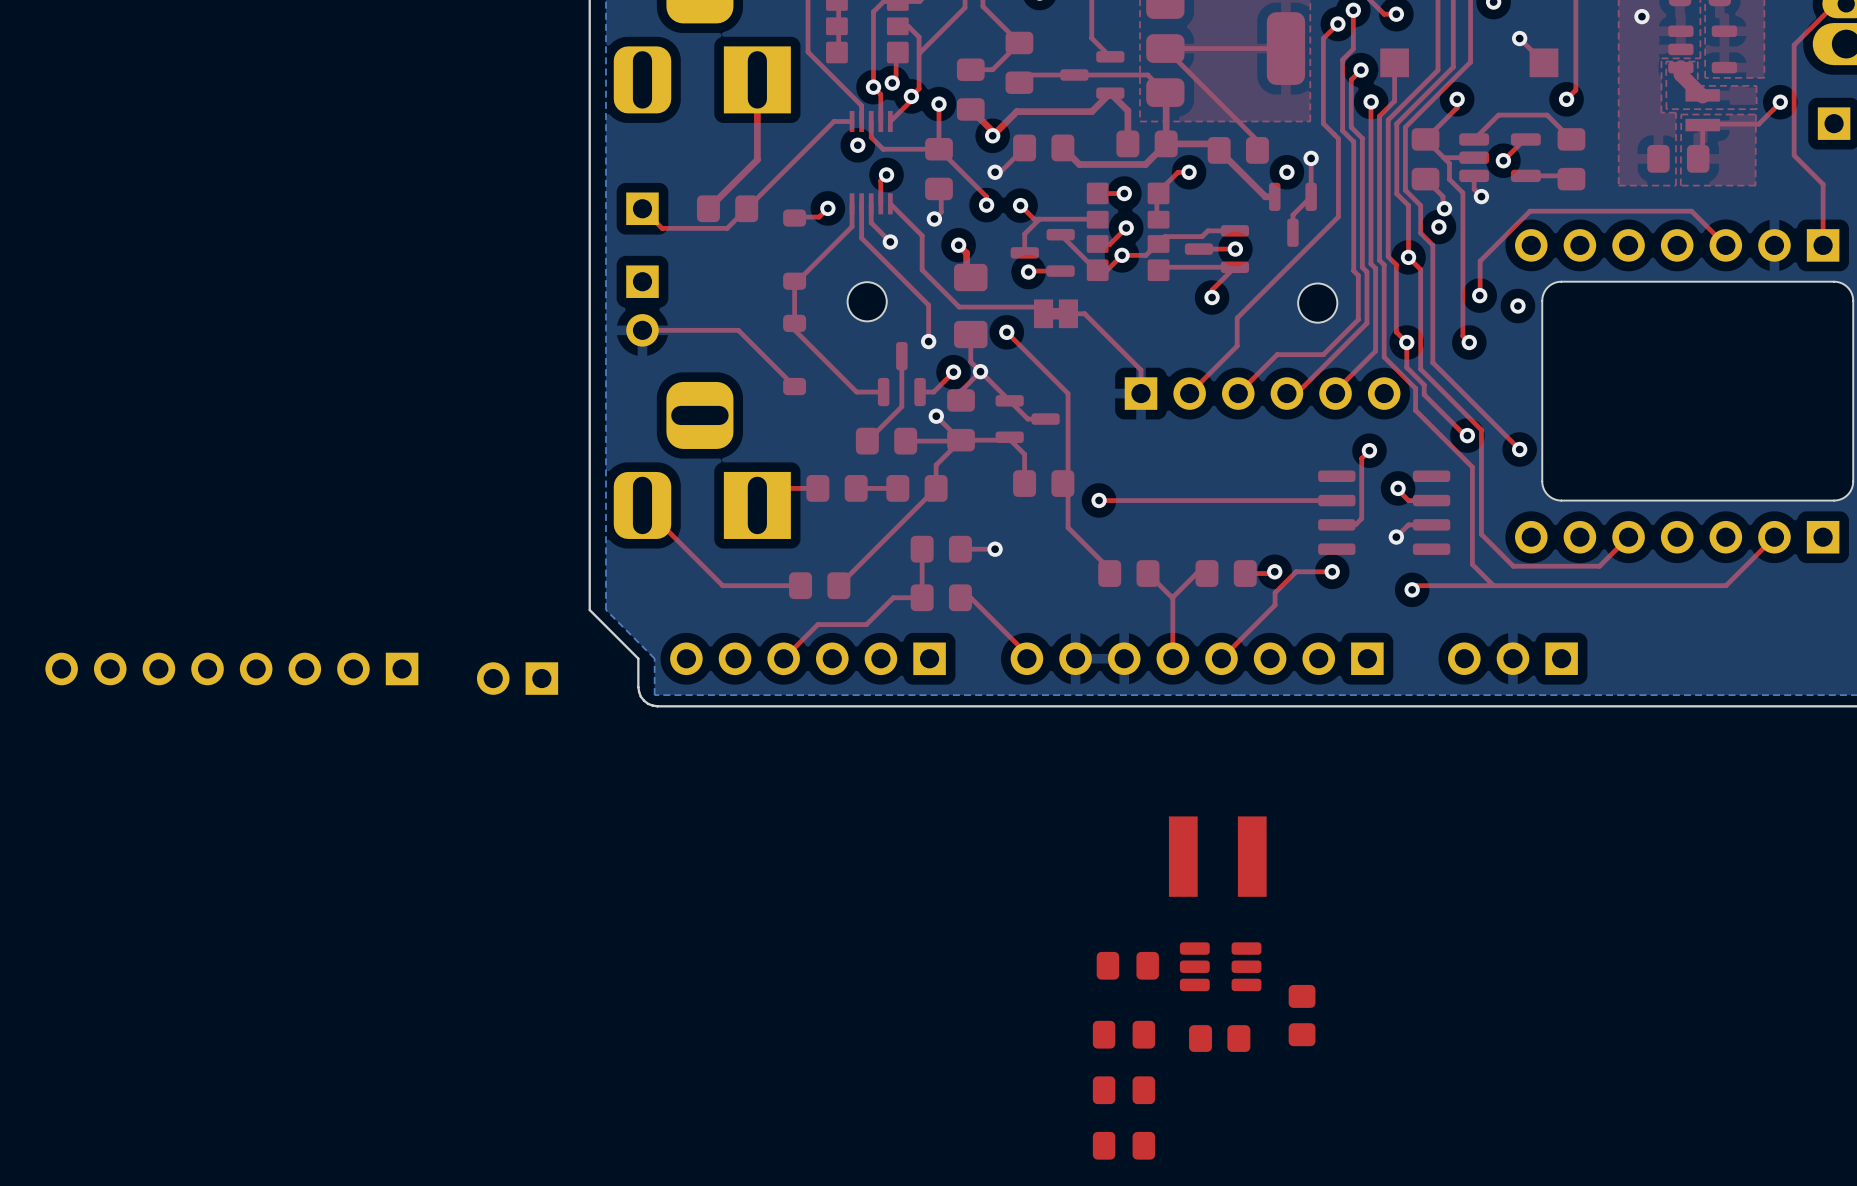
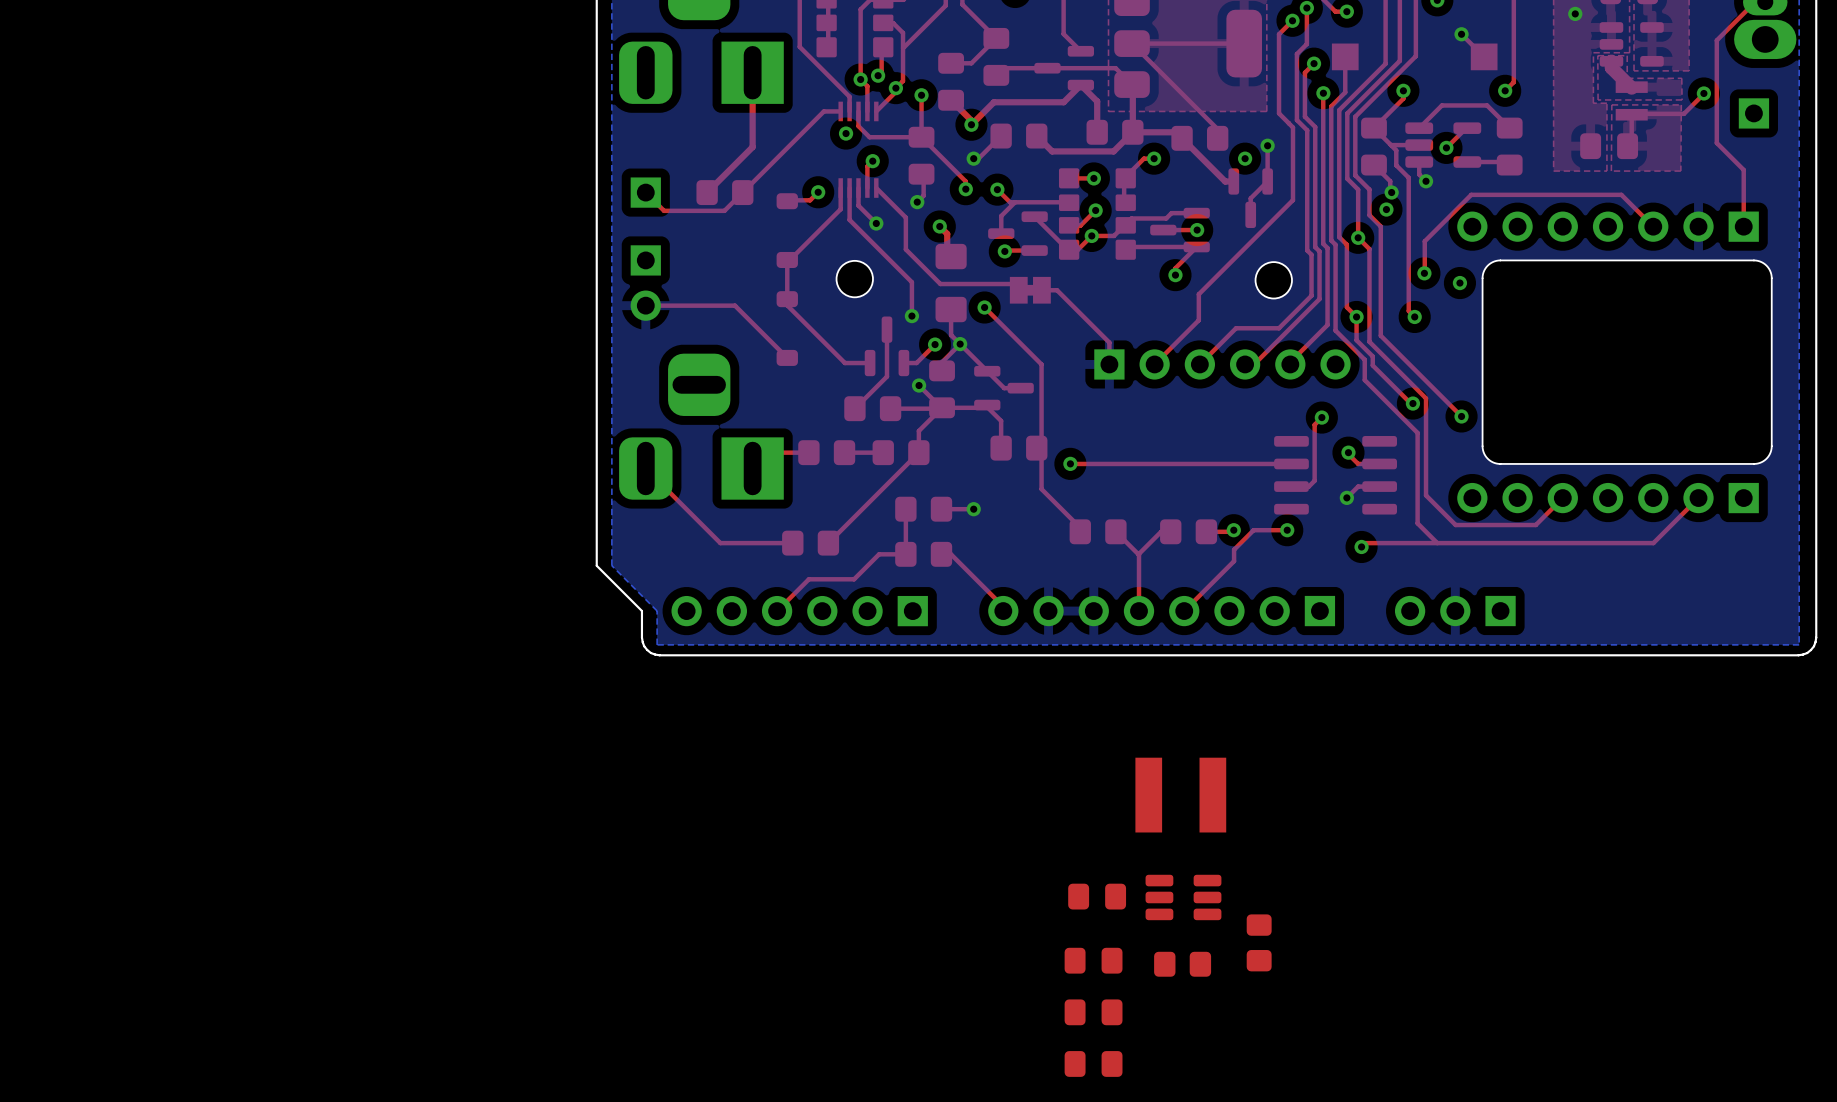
part: (231, 668) -> none
part: (517, 678) -> none

